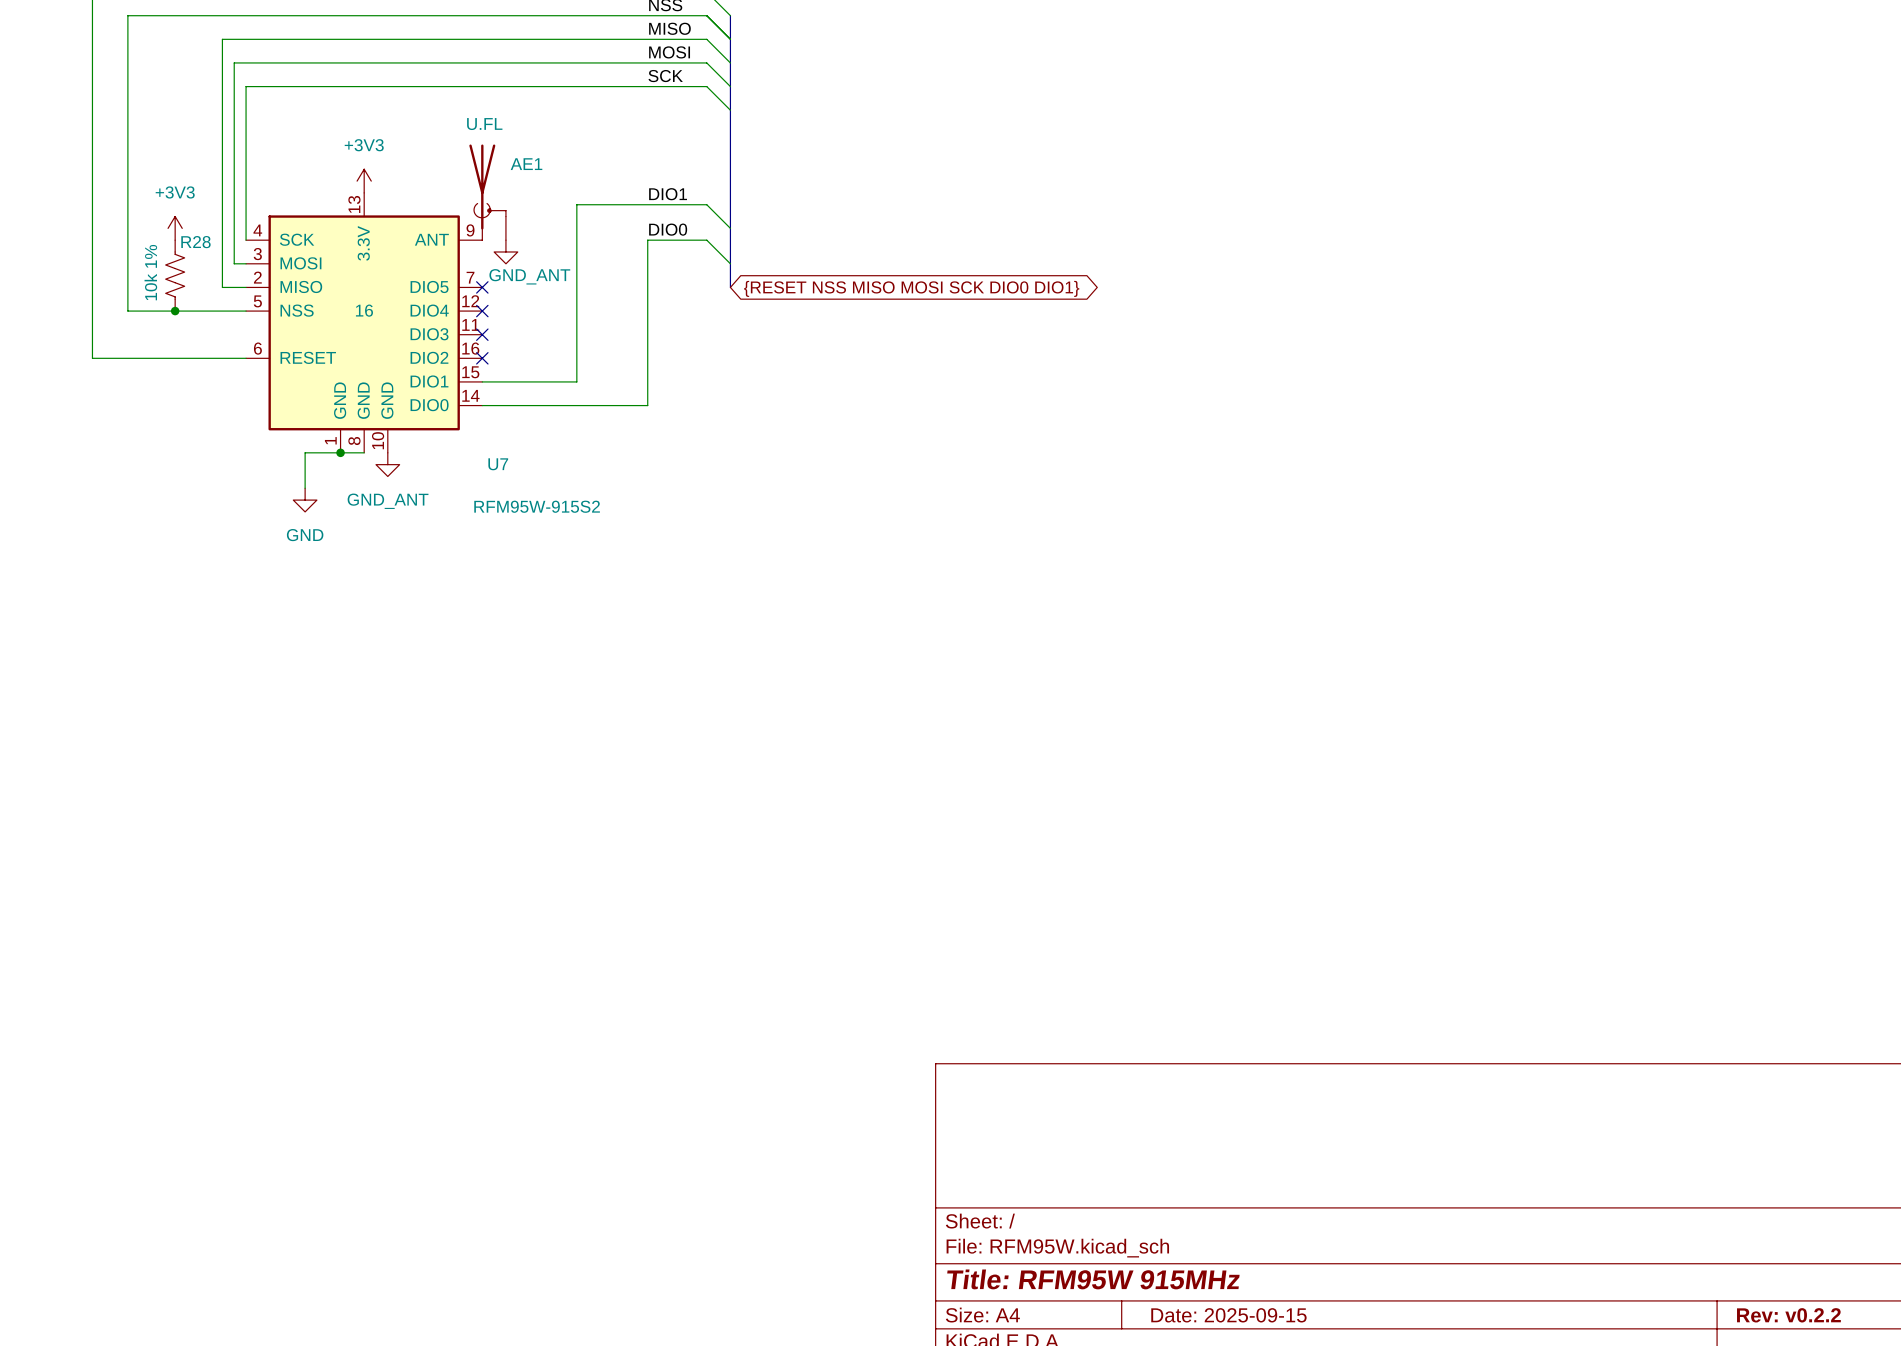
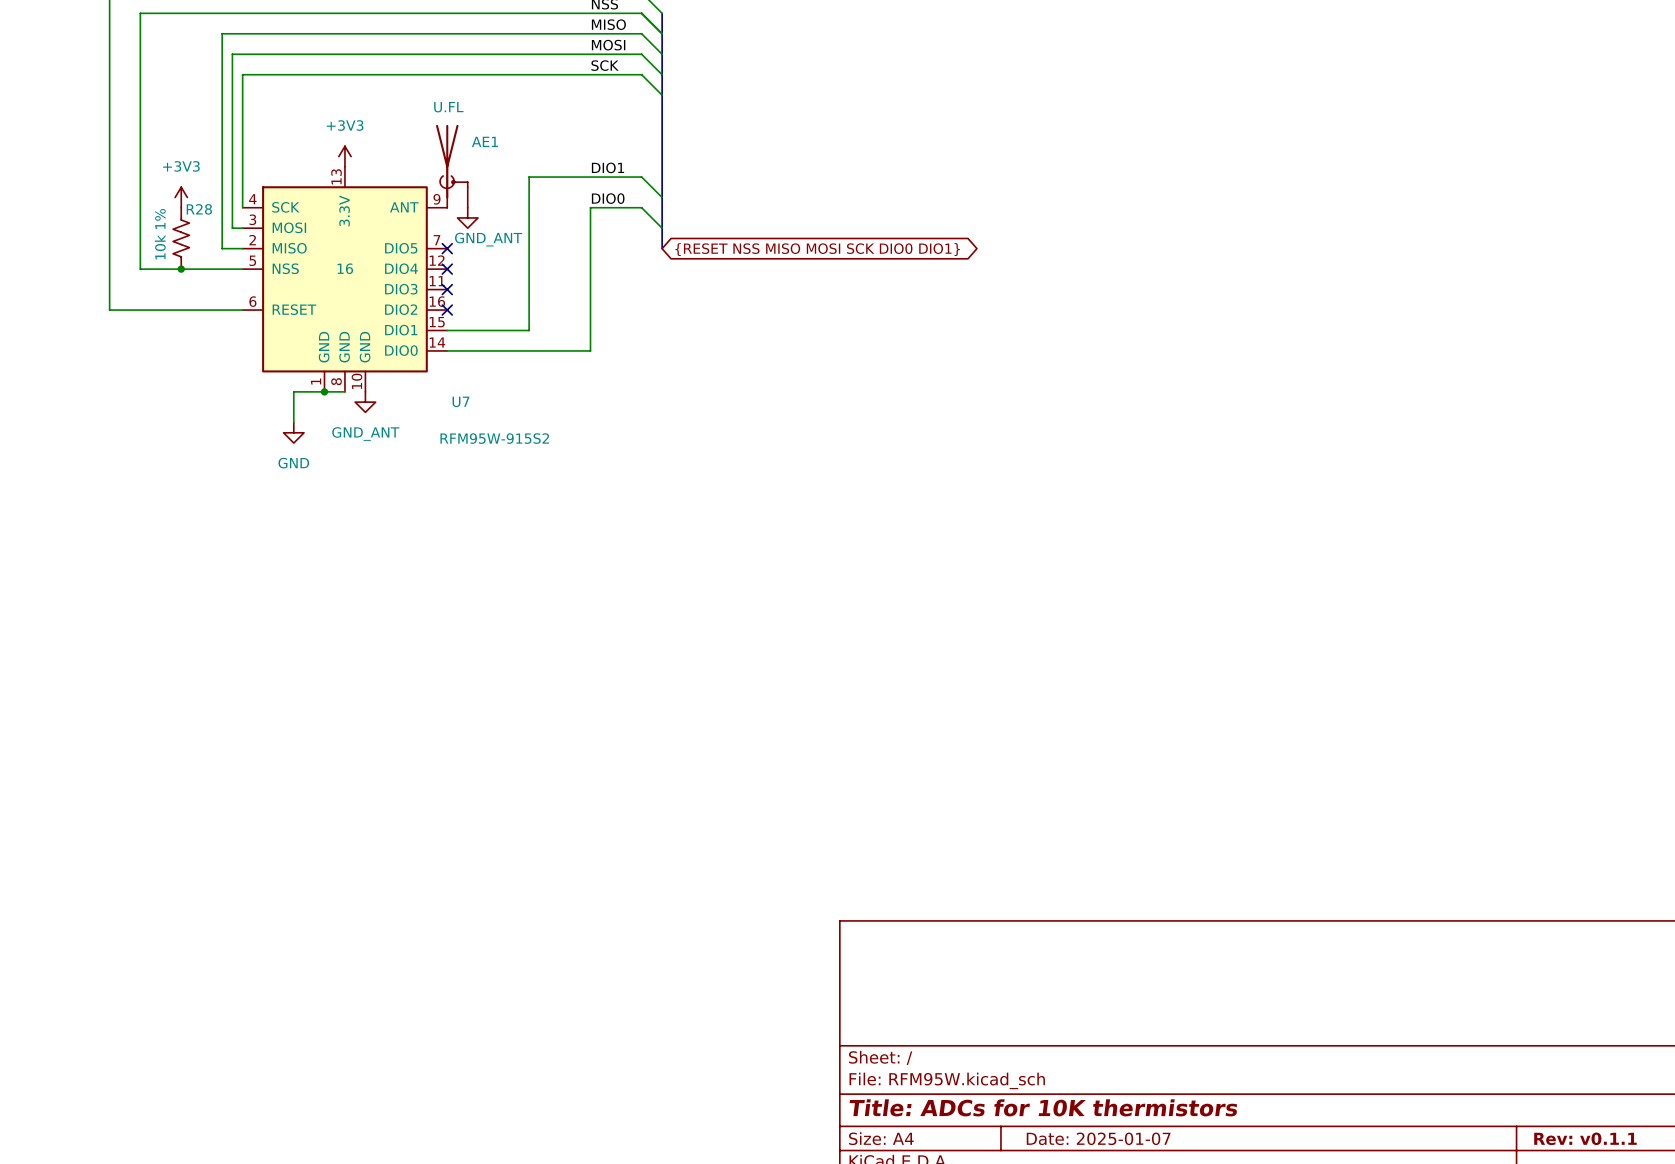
title block: Title: RFM95W 915MHz (1093, 1279) -> Title: ADCs for 10K thermistors (1043, 1107)
title block: Date: 2025-09-15 (1228, 1315) -> Date: 2025-01-07 (1098, 1138)
title block: Rev: v0.2.2 (1788, 1315) -> Rev: v0.1.1 (1585, 1138)

